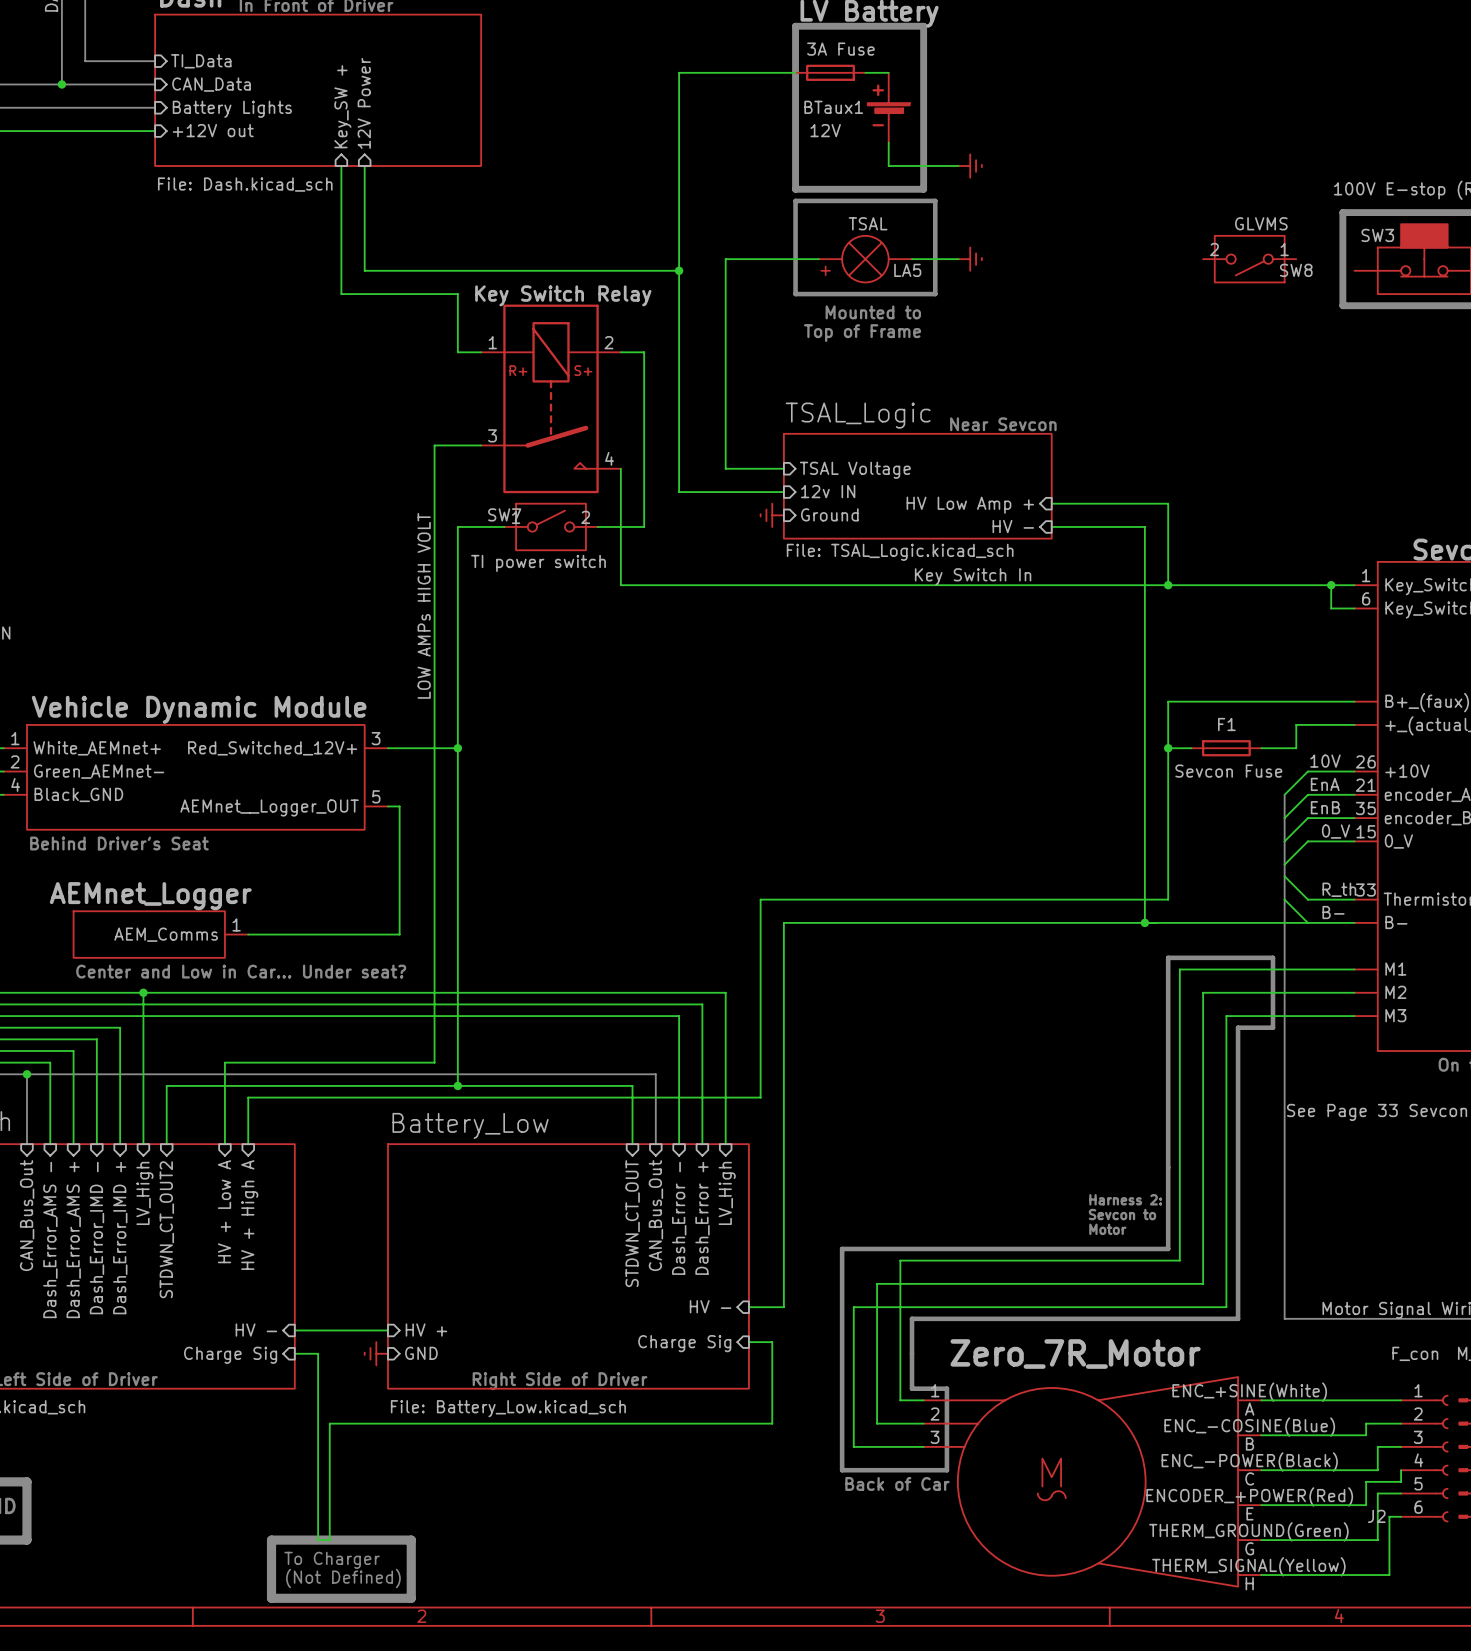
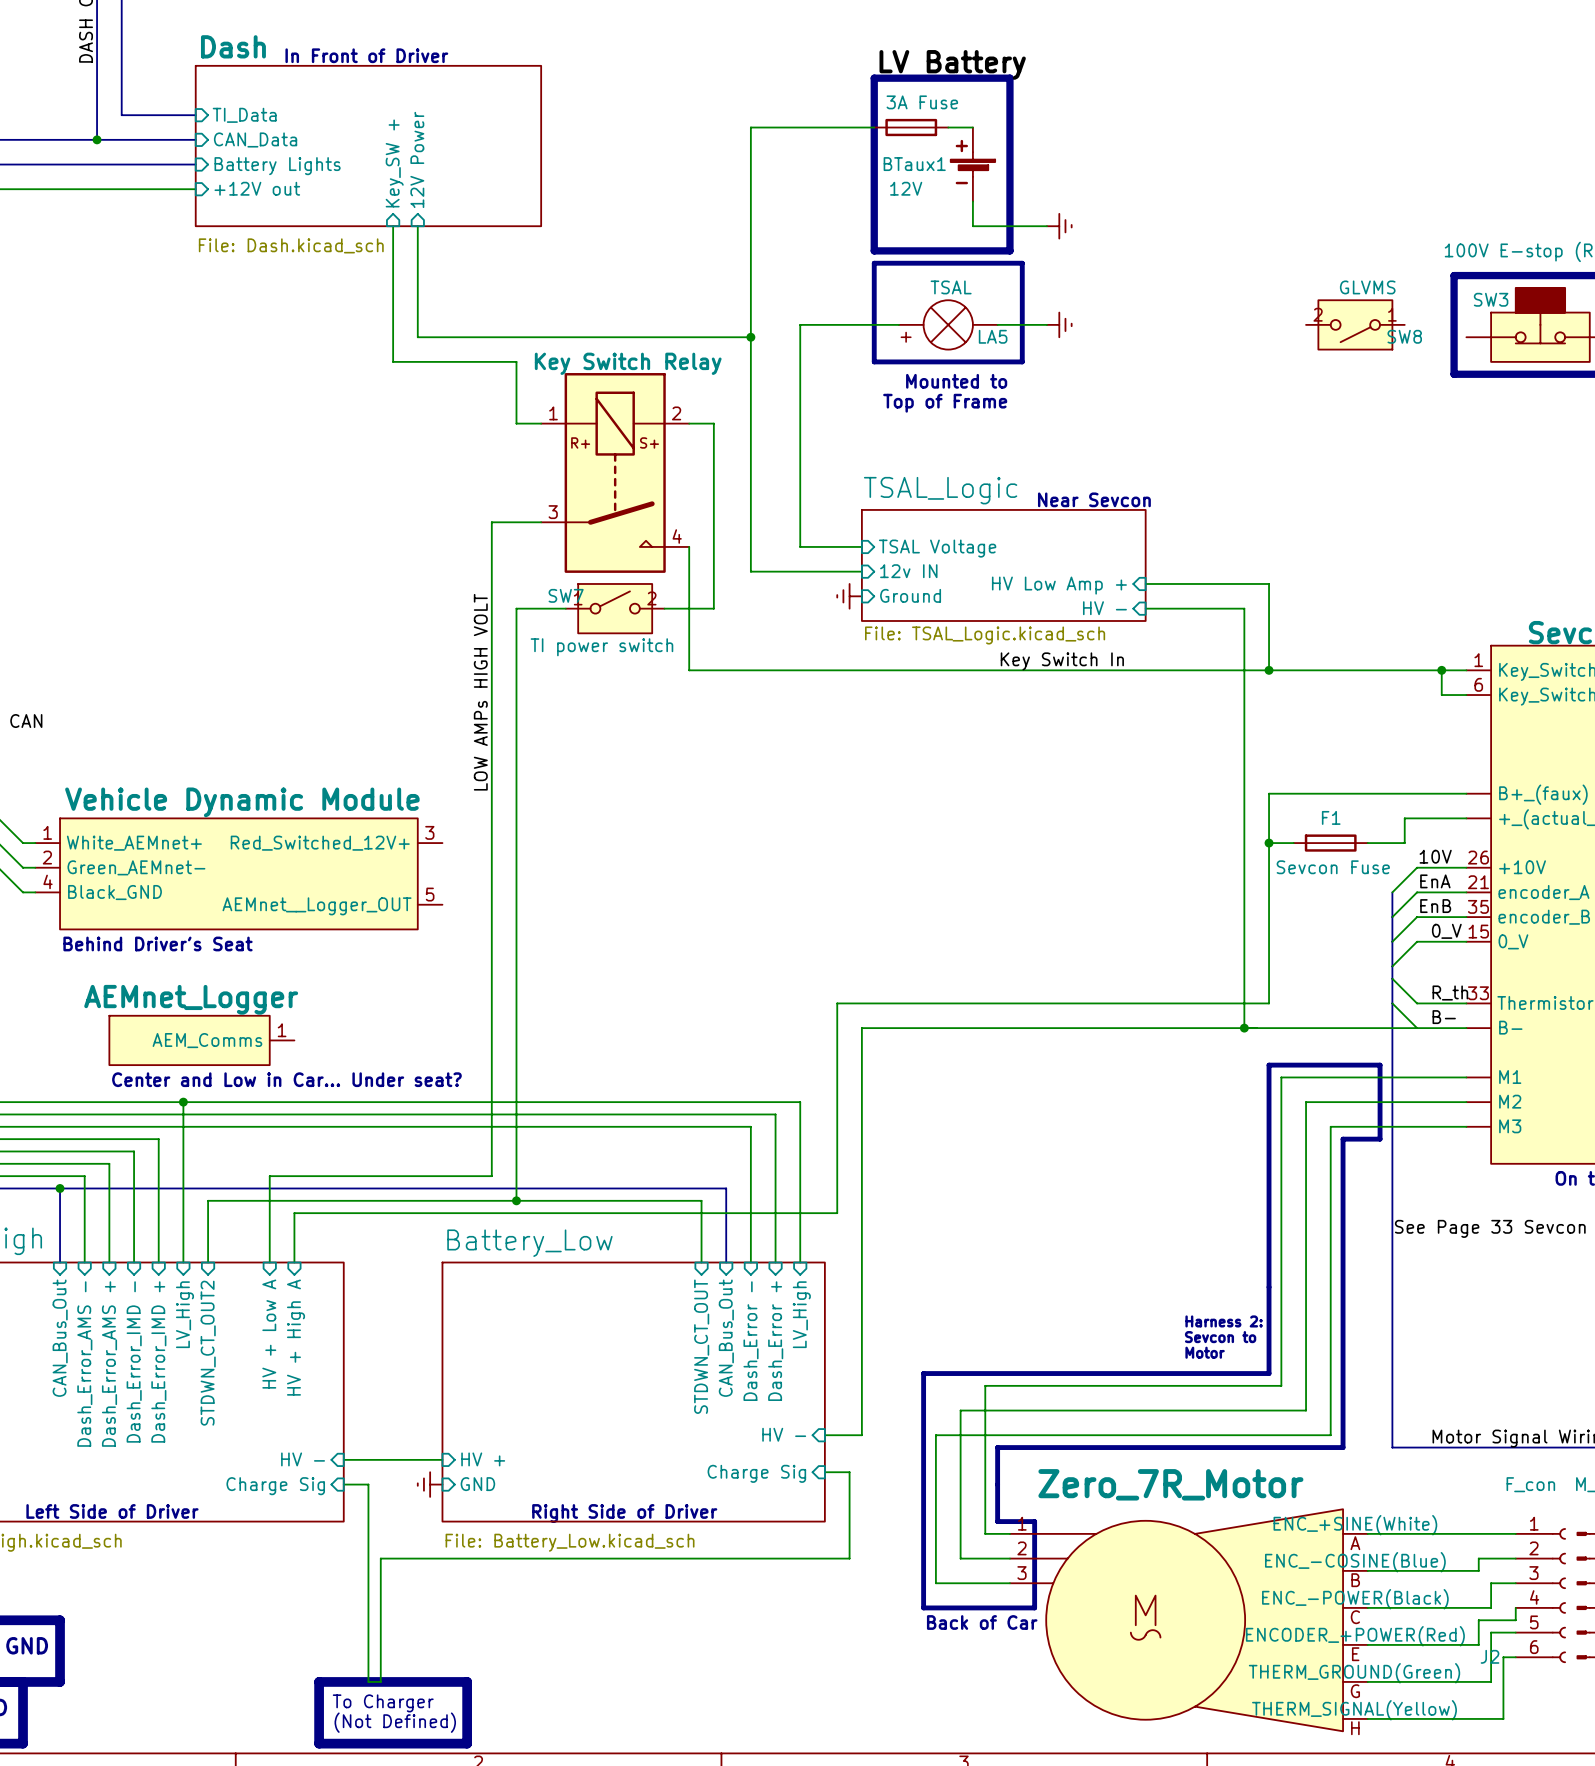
wire: (387, 748) (457, 748) -> none
junction: (457, 748) -> none
wire: (387, 806) (399, 806) (399, 934) (248, 934) -> none

